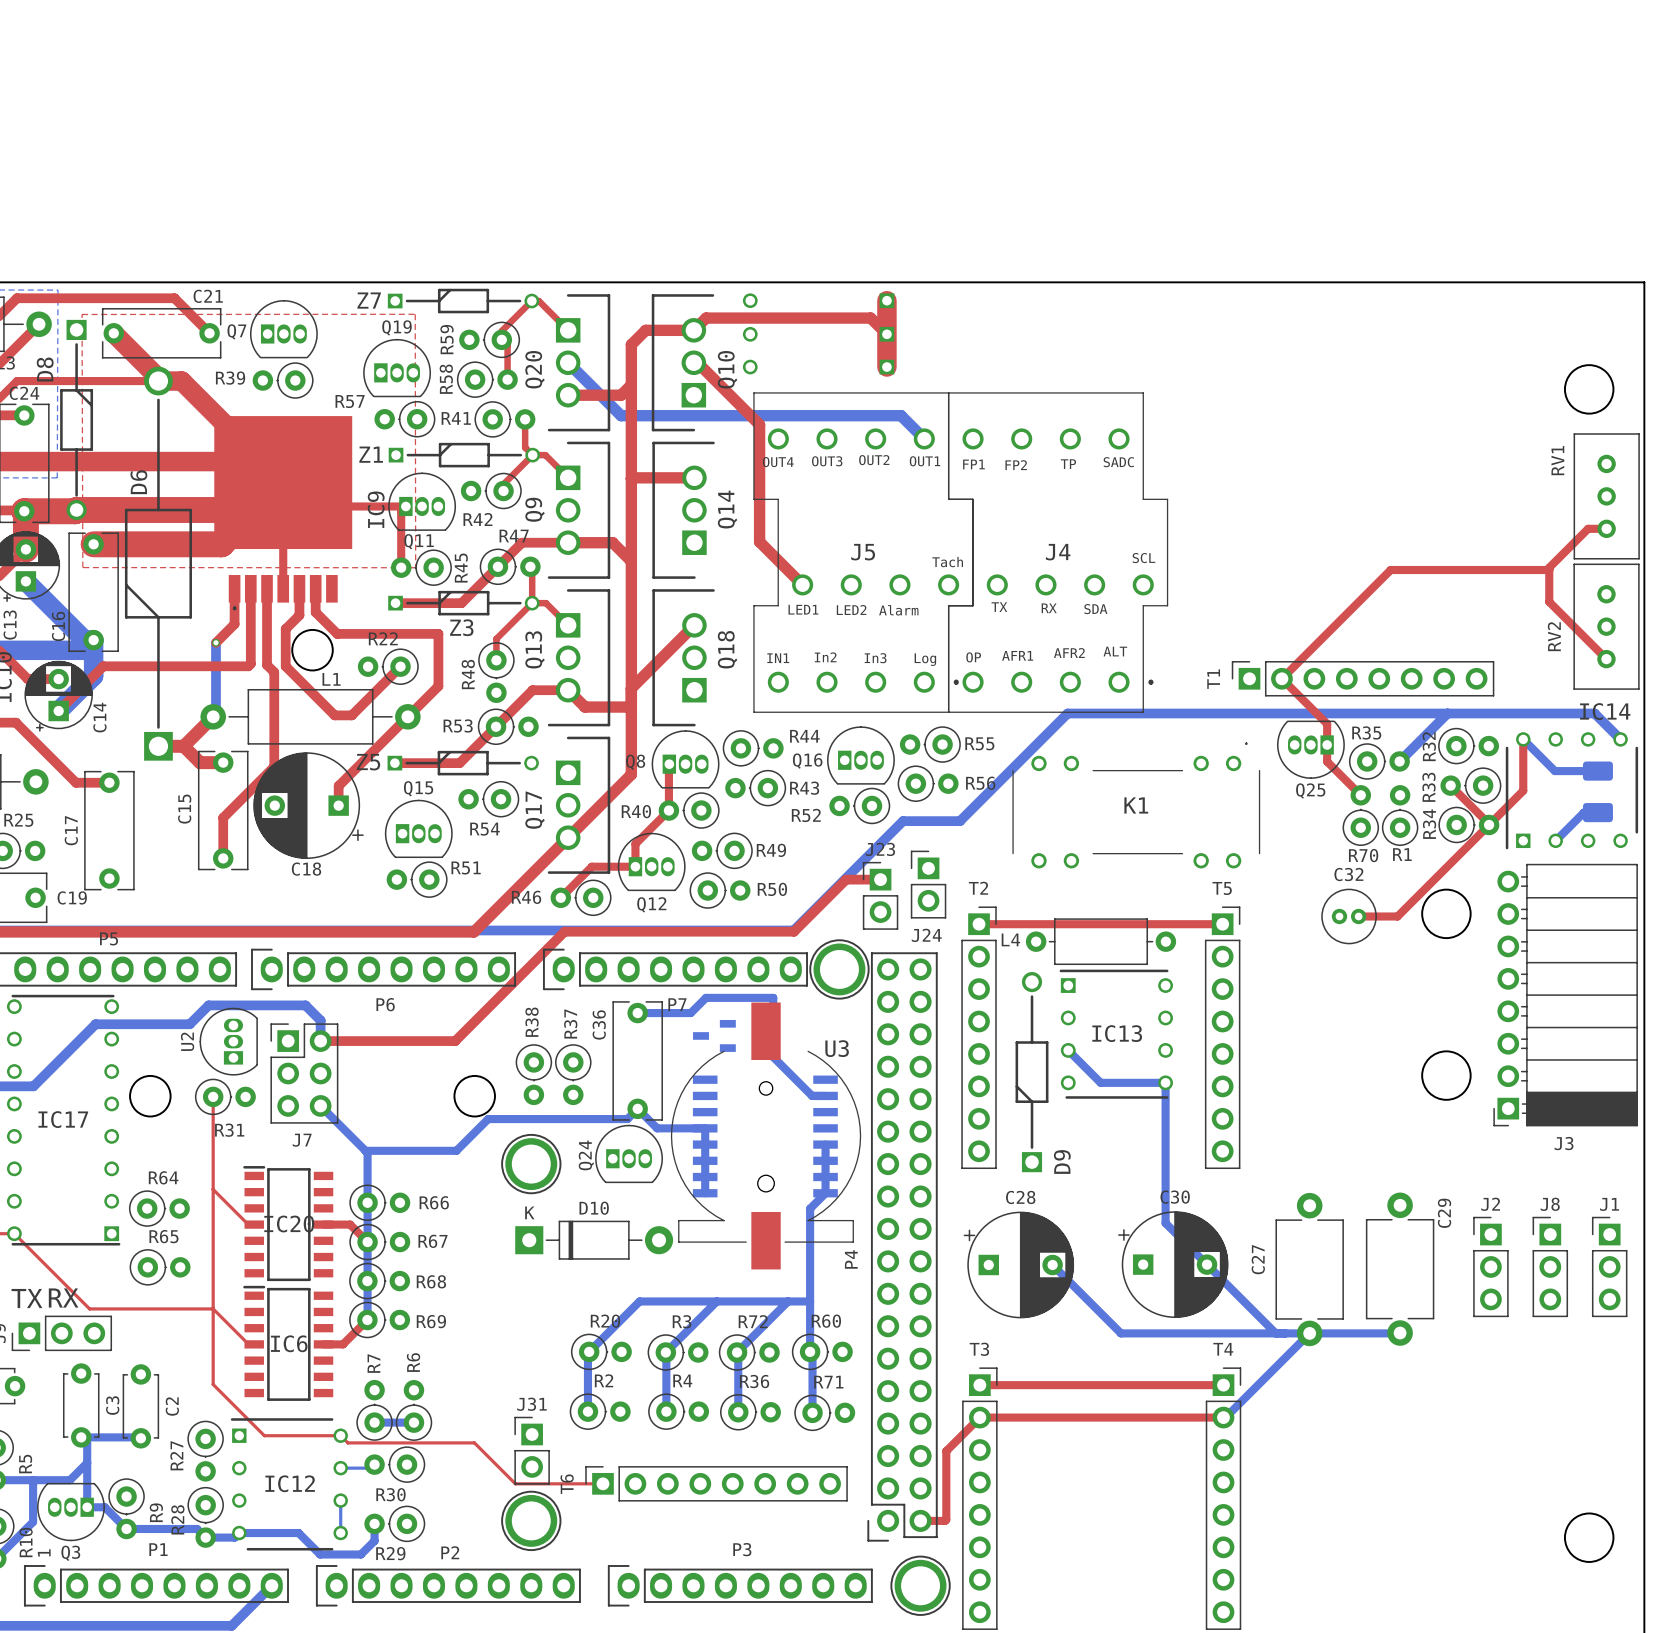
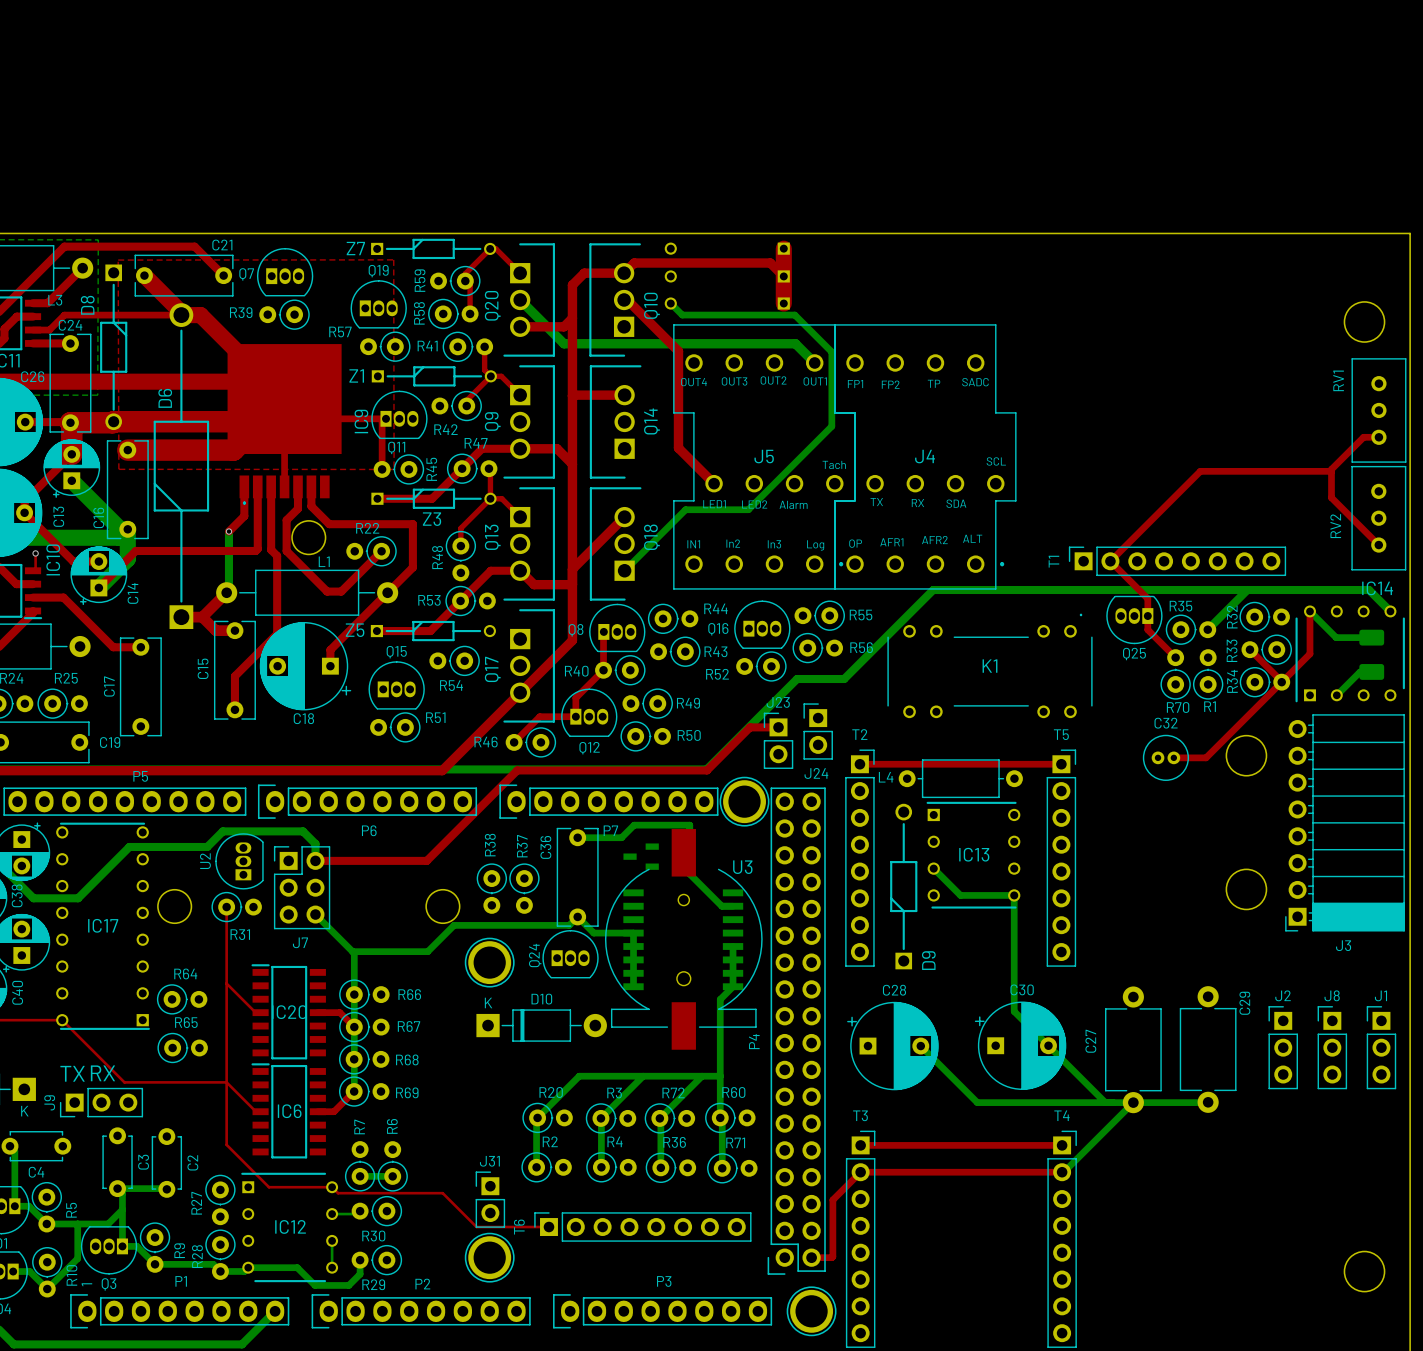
bottom track: none -> (670, 303) (682, 315) (794, 315) (831, 352) (831, 426) (748, 509) (685, 509) (624, 570)

